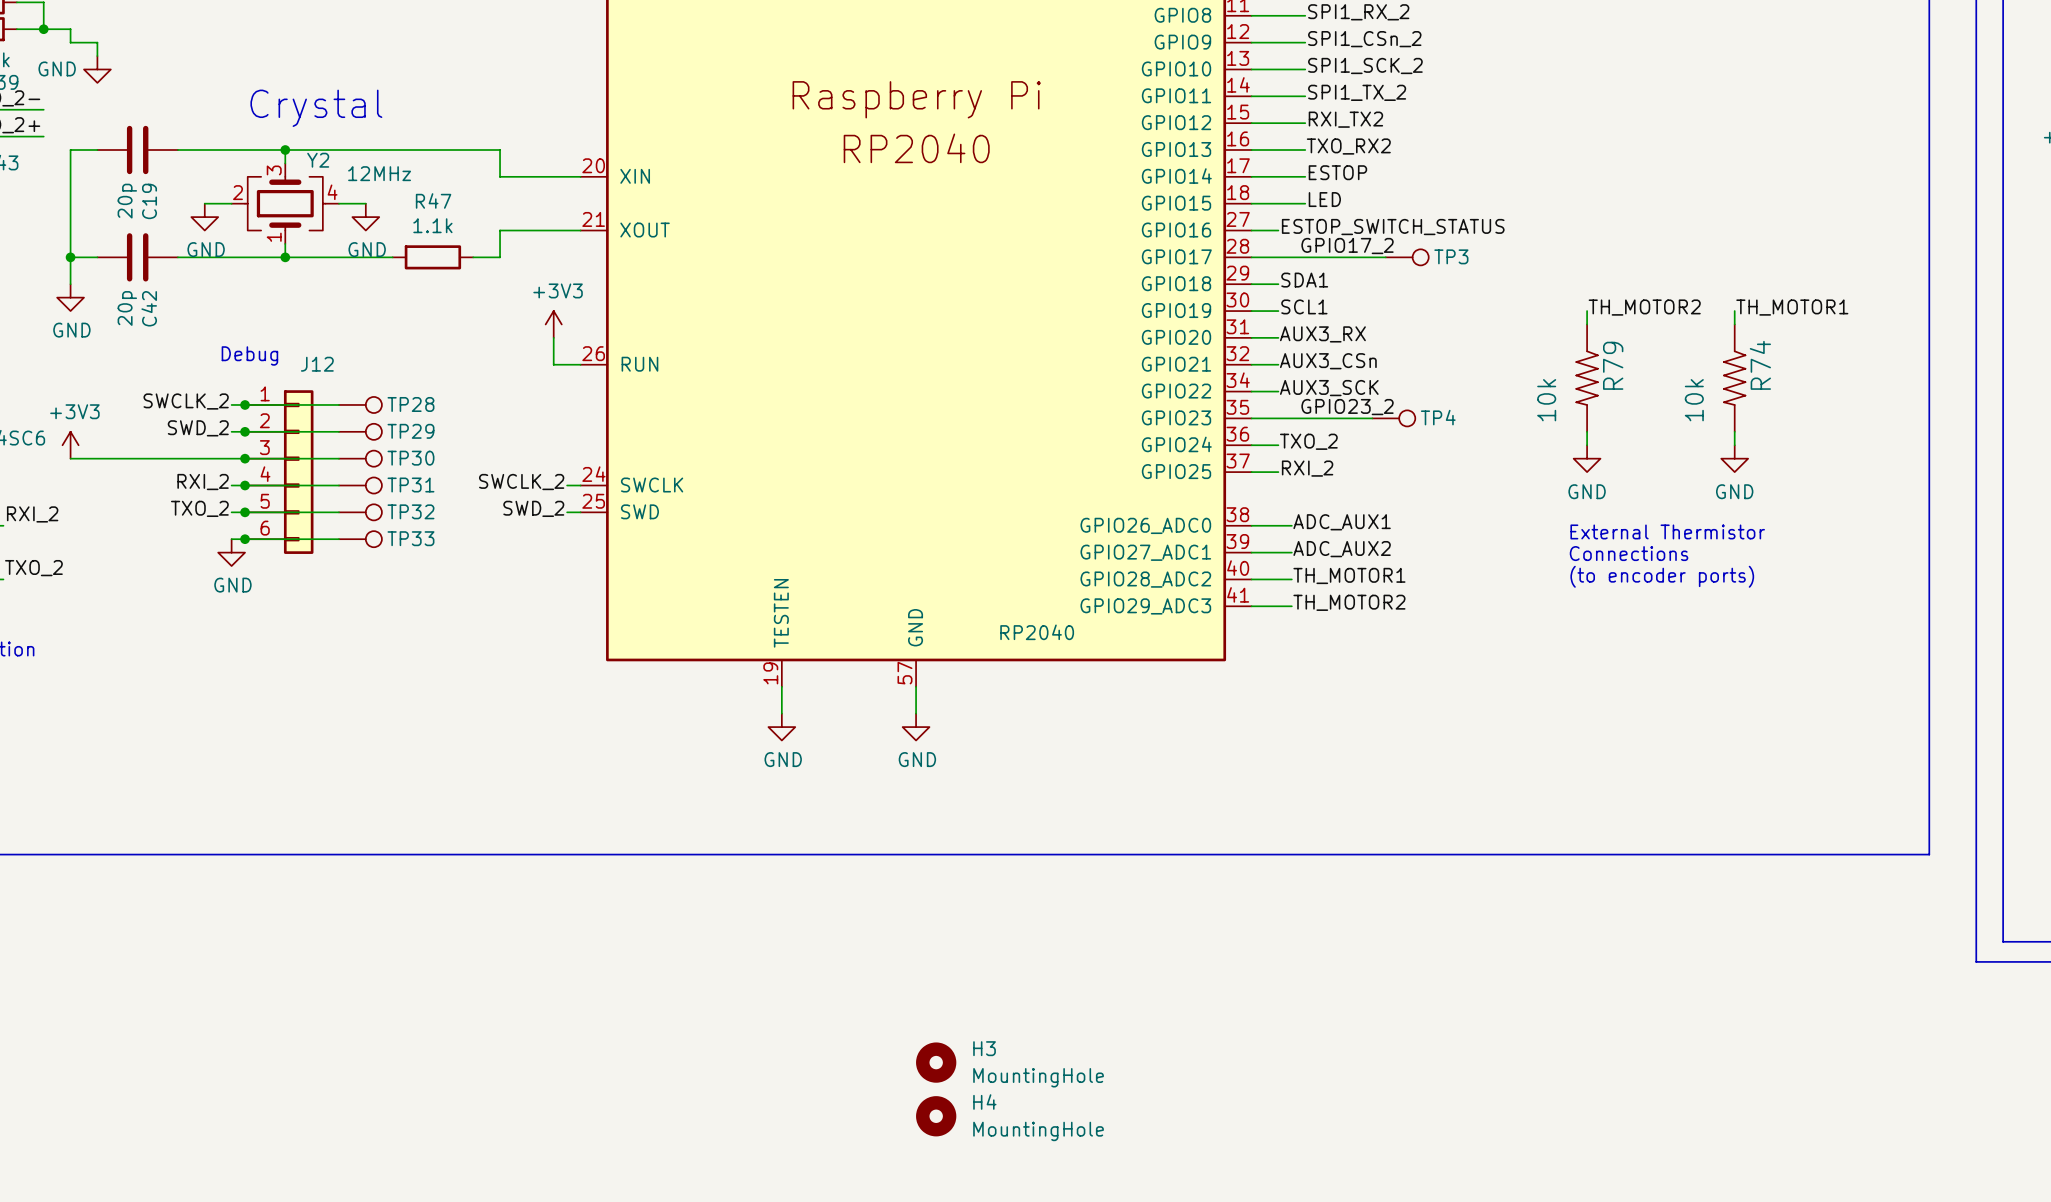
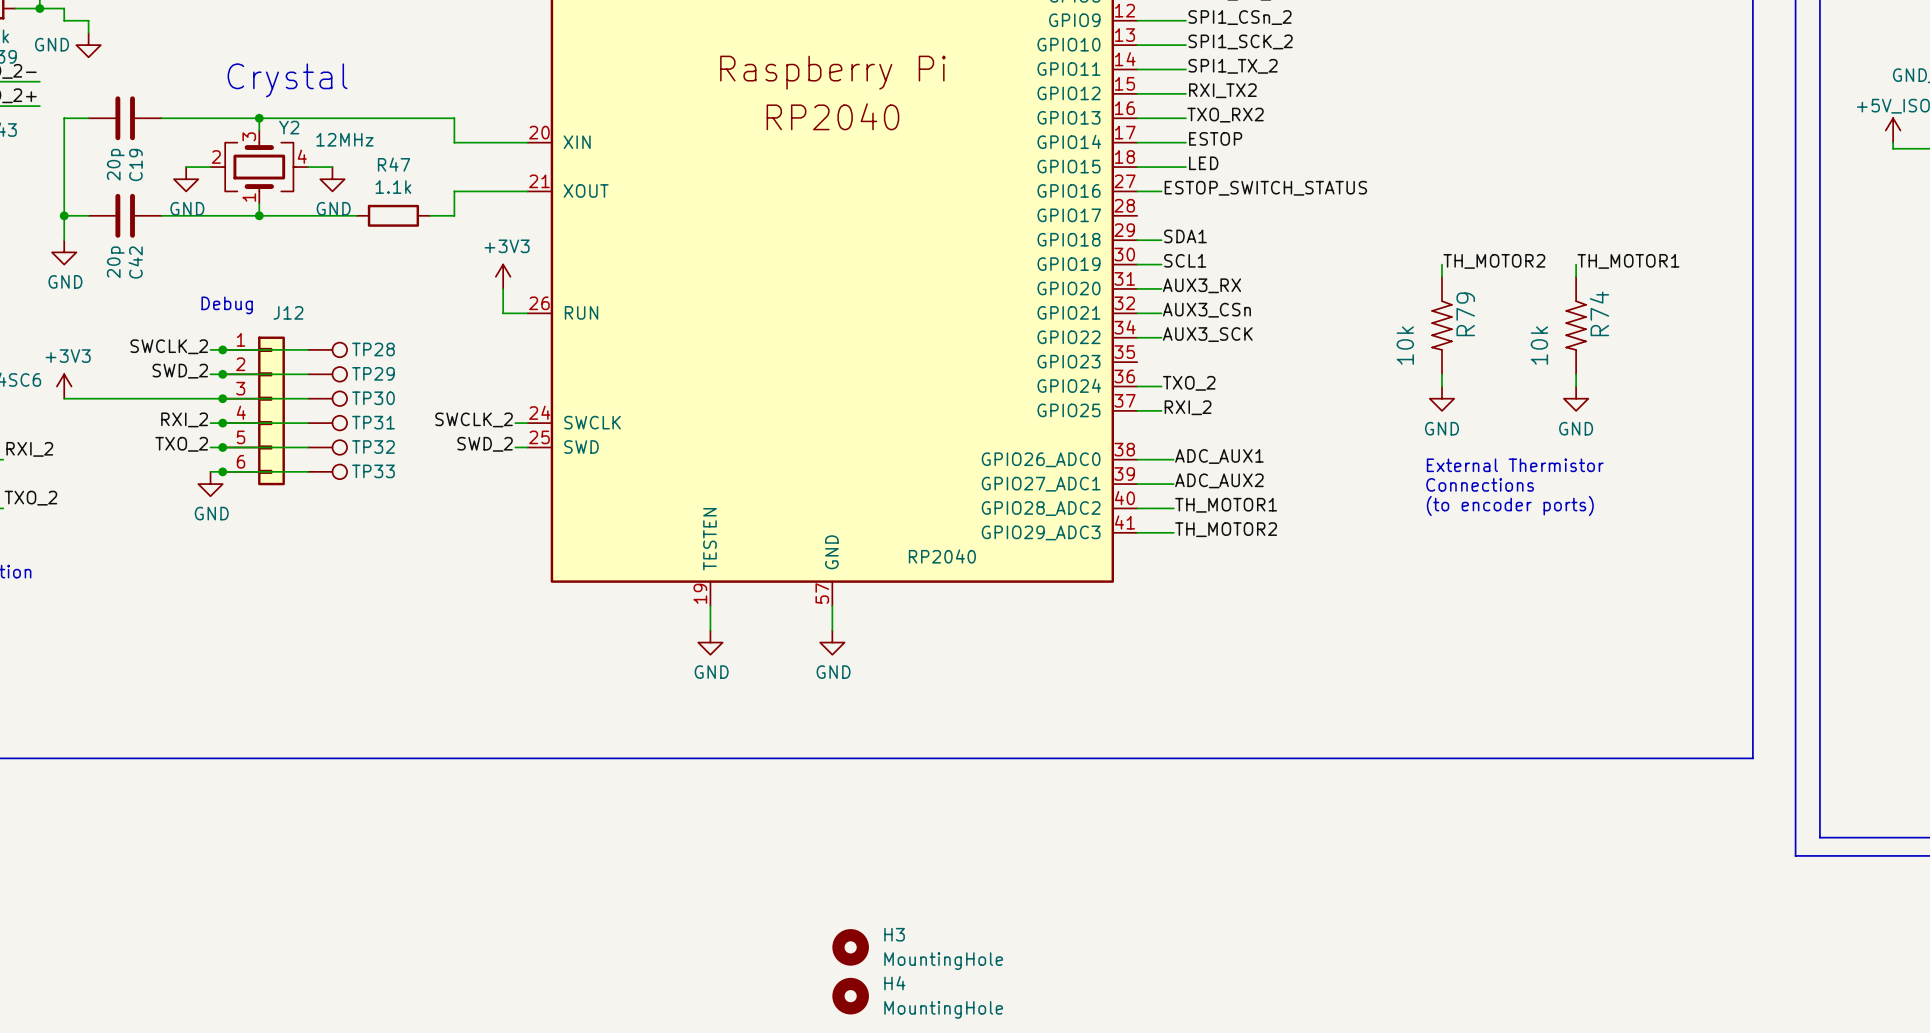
label: GPIO17_2 (1347, 246) -> none
wire: (1251, 257) (1385, 257) -> none
TP3: (1407, 257) -> none
label: GPIO23_2 (1347, 407) -> none
wire: (1251, 418) (1372, 418) -> none
TP4: (1393, 418) -> none

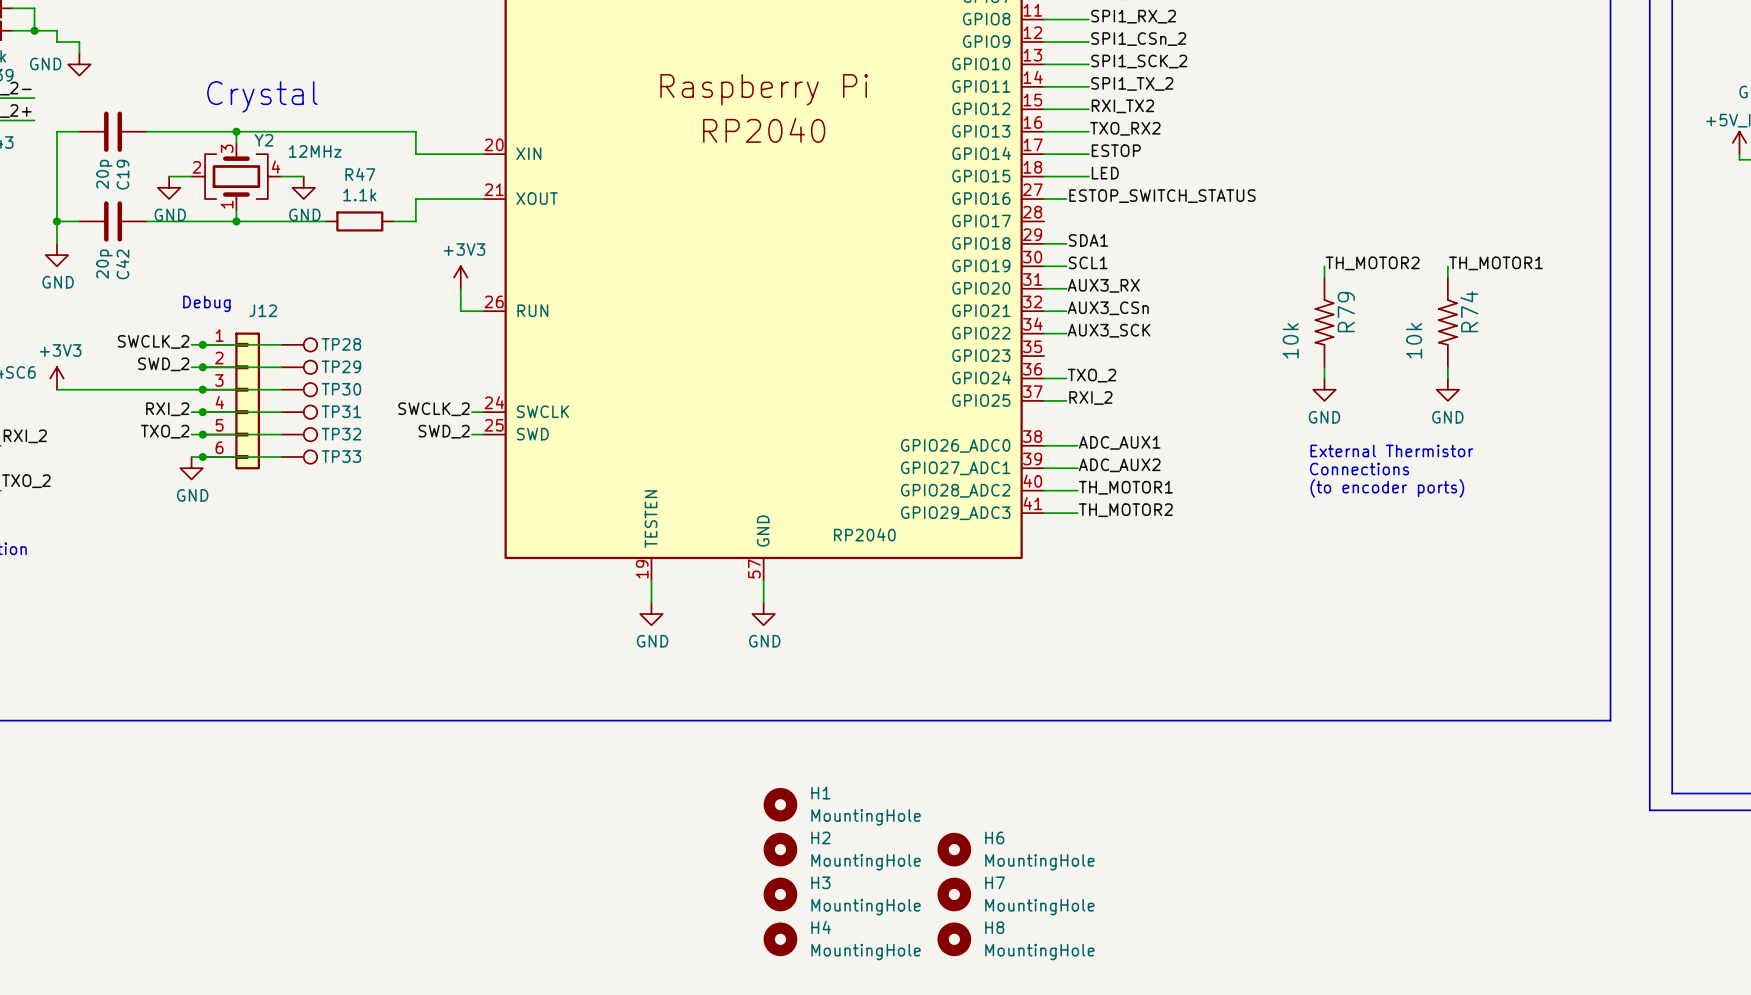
H1: none -> MountingHole (780, 804)
H2: none -> MountingHole (780, 849)
H6: none -> MountingHole (954, 849)
H7: none -> MountingHole (954, 894)
H8: none -> MountingHole (954, 939)

